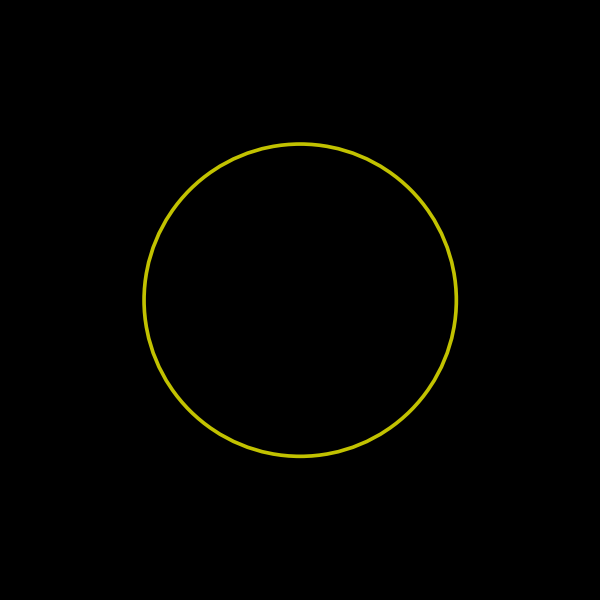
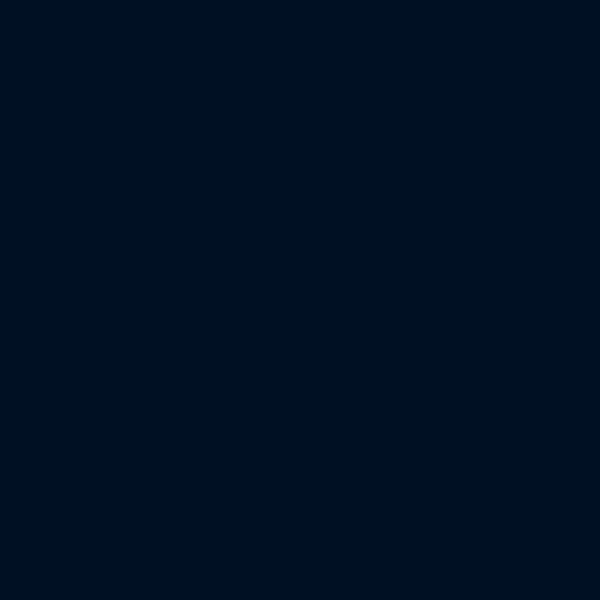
round board edge: [142, 142, 459, 459] -> none

